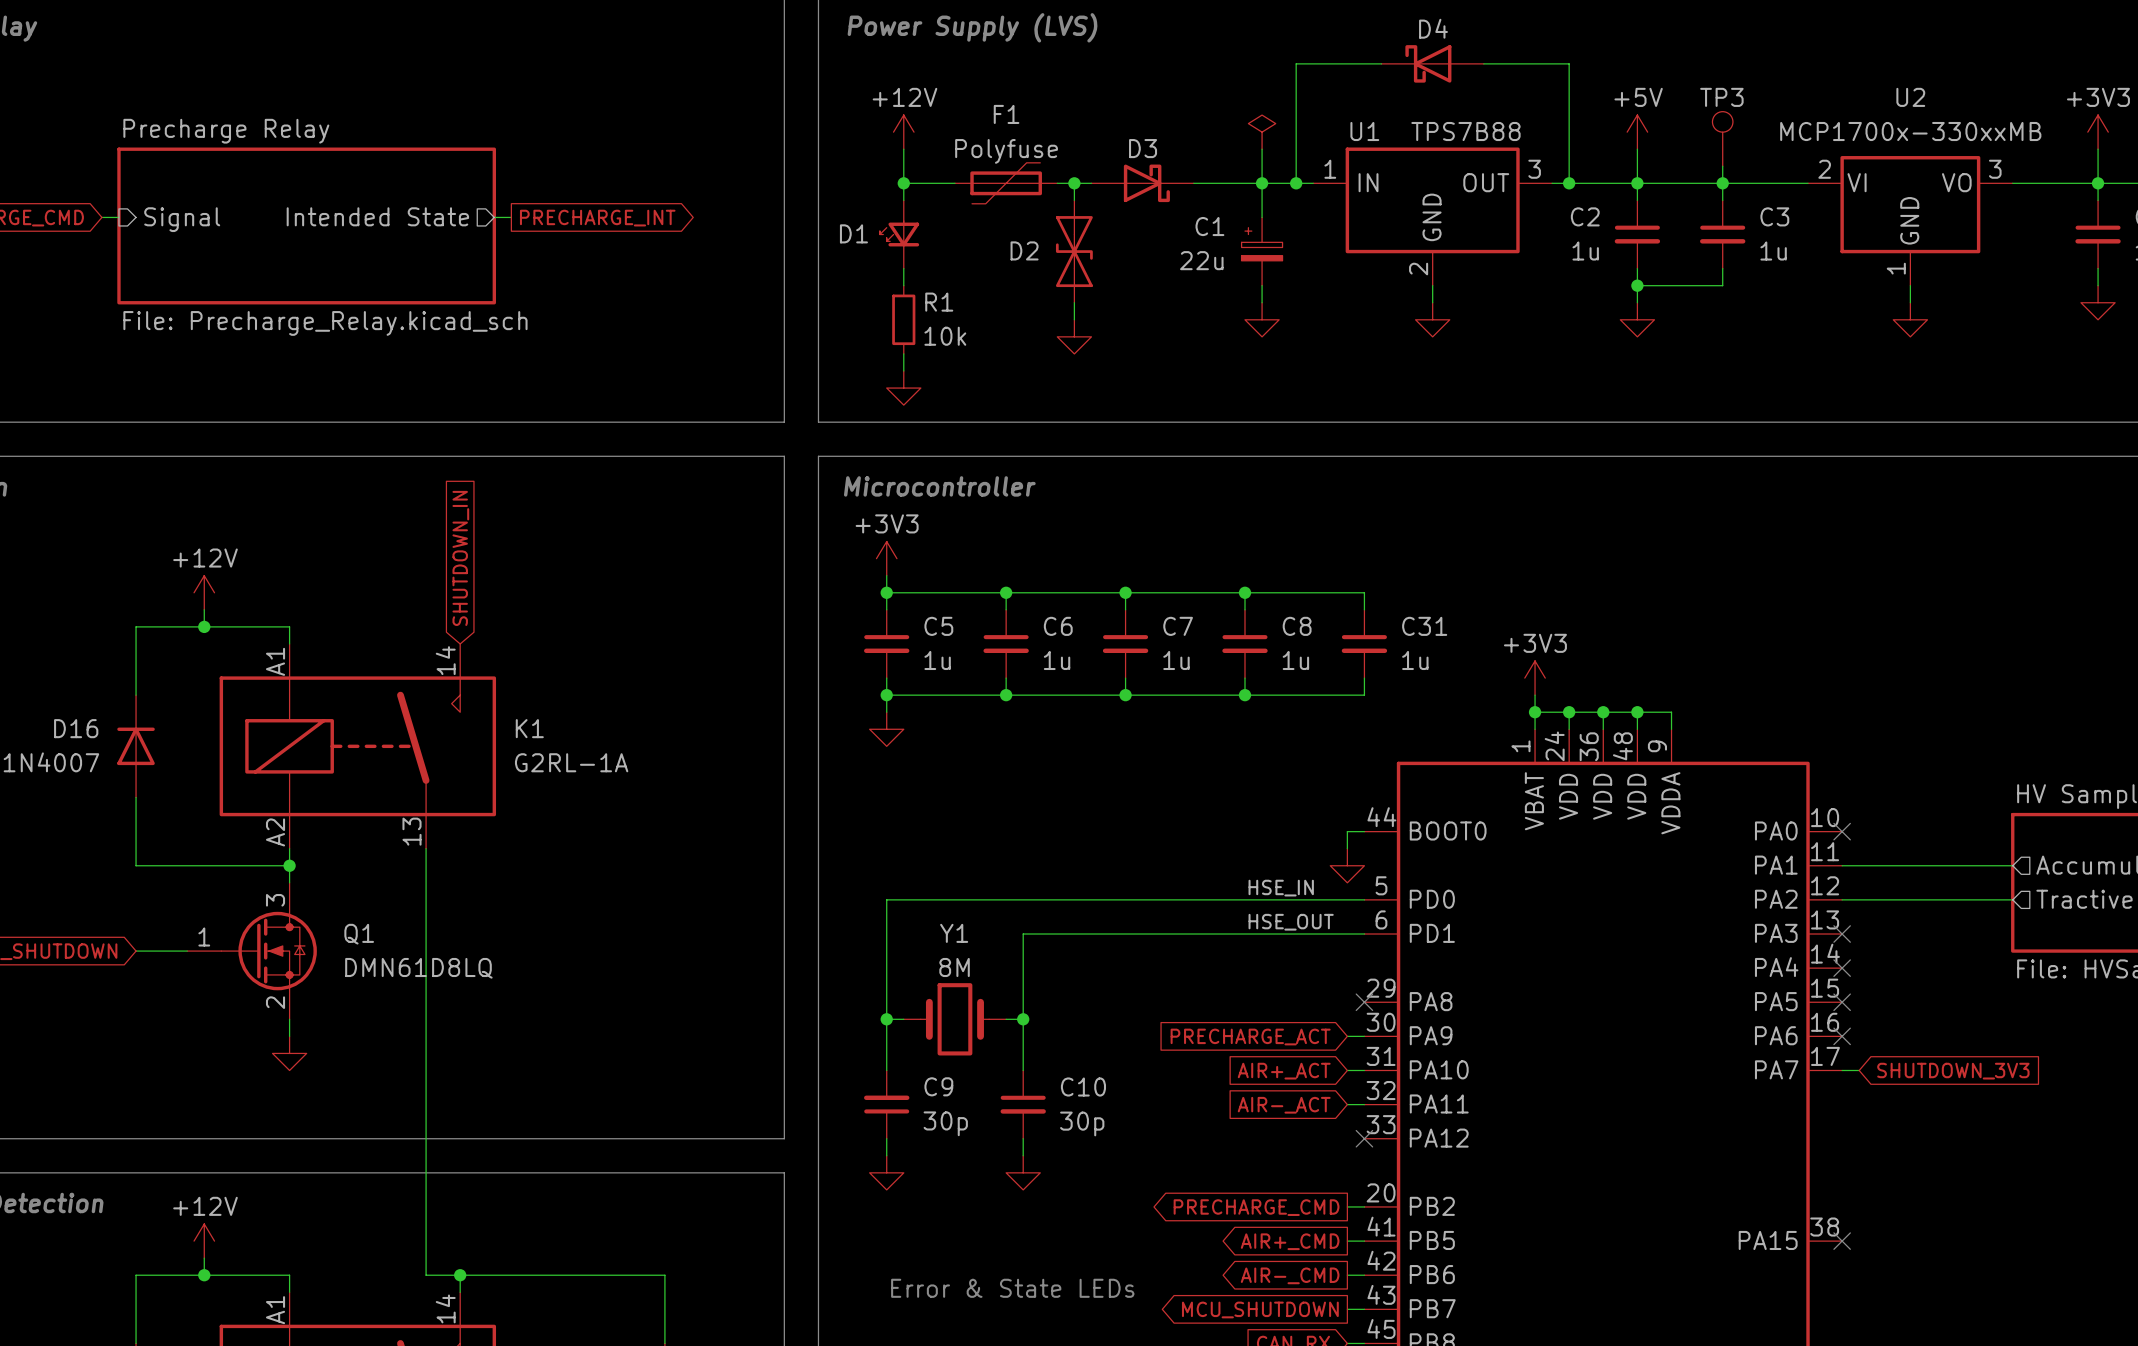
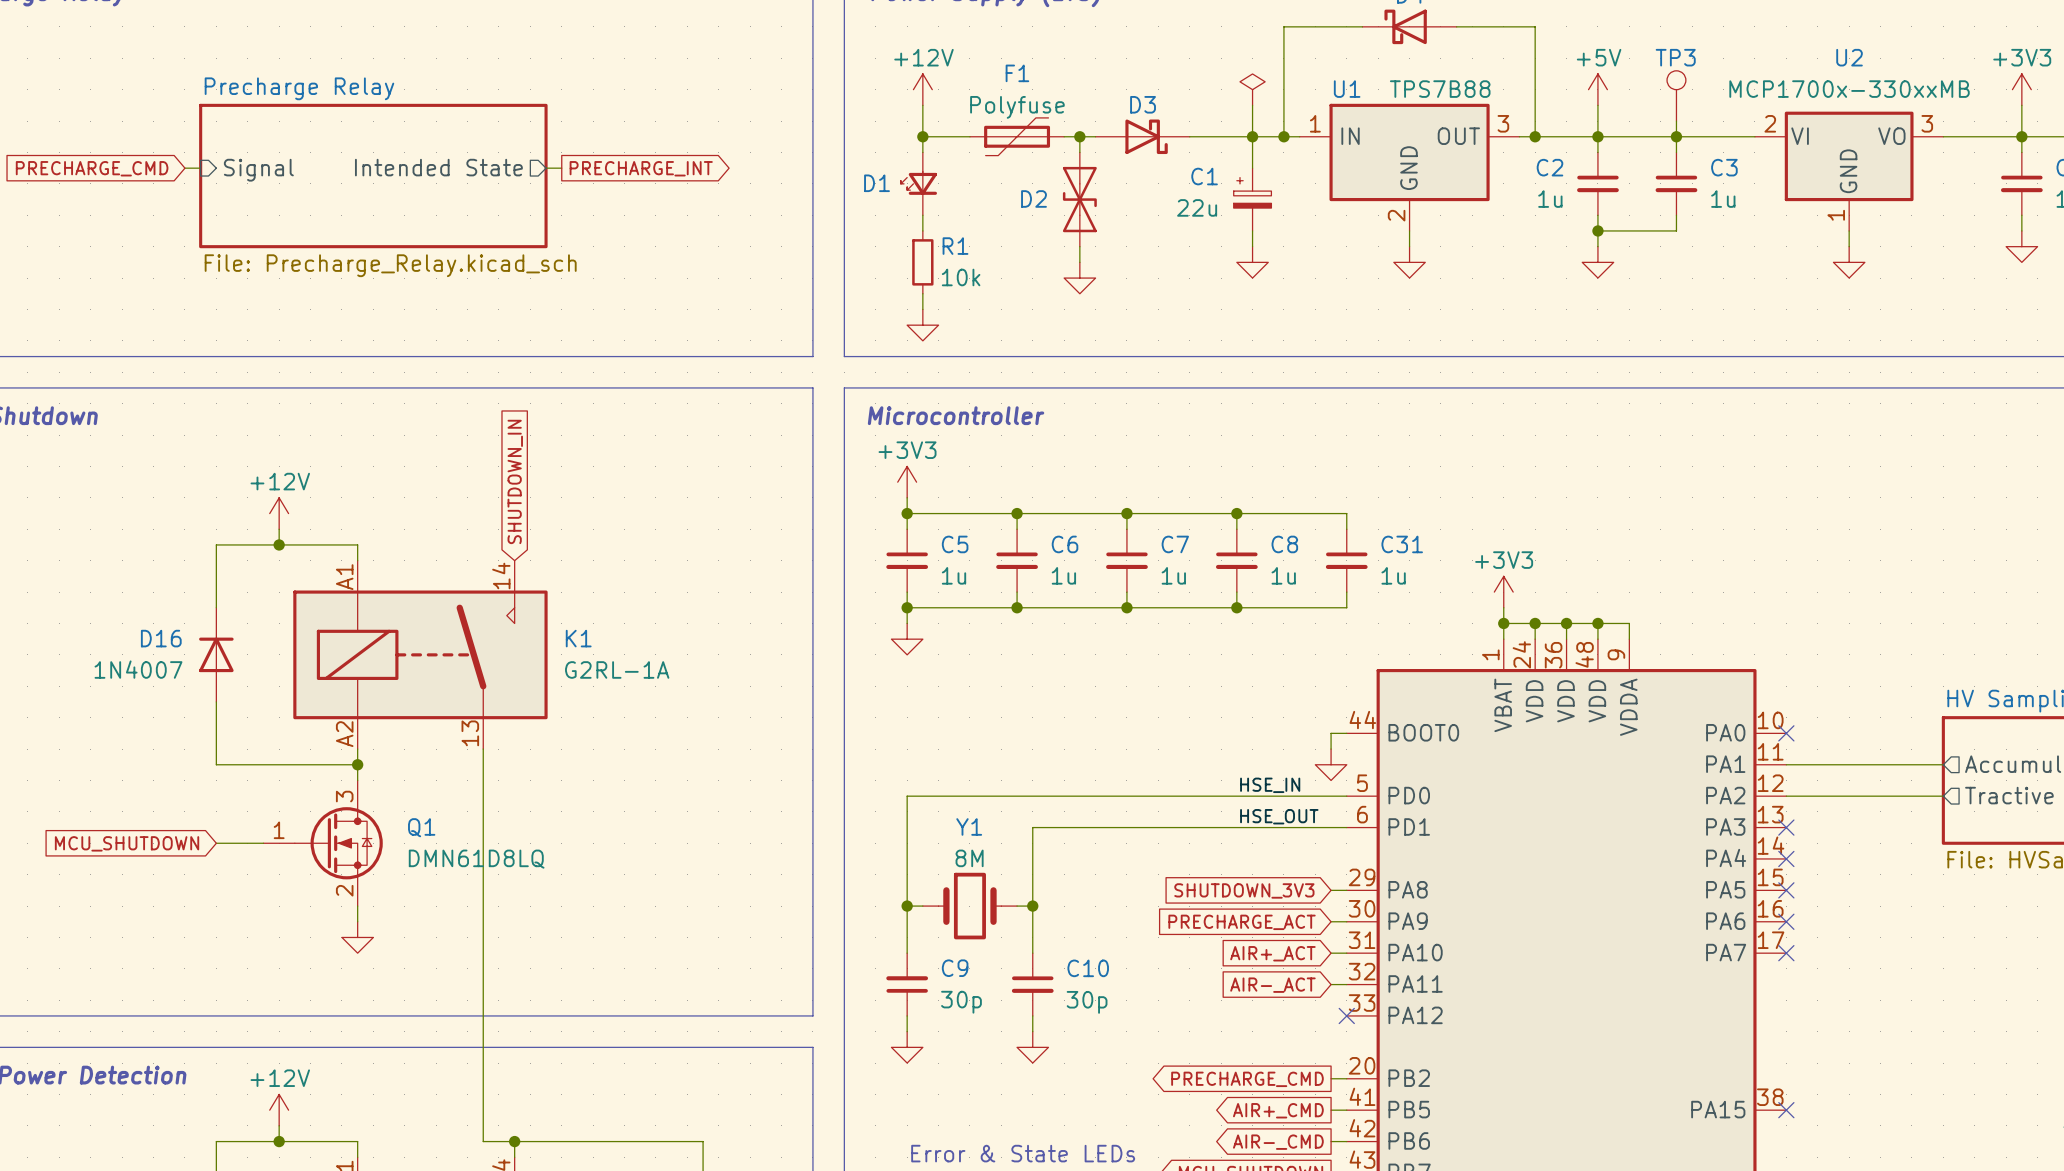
global label: none -> SHUTDOWN_3V3 (1244, 890)
wire: none -> (1331, 890) (1346, 890)
no-connect mark: (1364, 1002) -> none
wire: (1842, 1070) (1859, 1070) -> none
no-connect mark: none -> (1786, 953)
global label: SHUTDOWN_3V3 (1953, 1071) -> none

